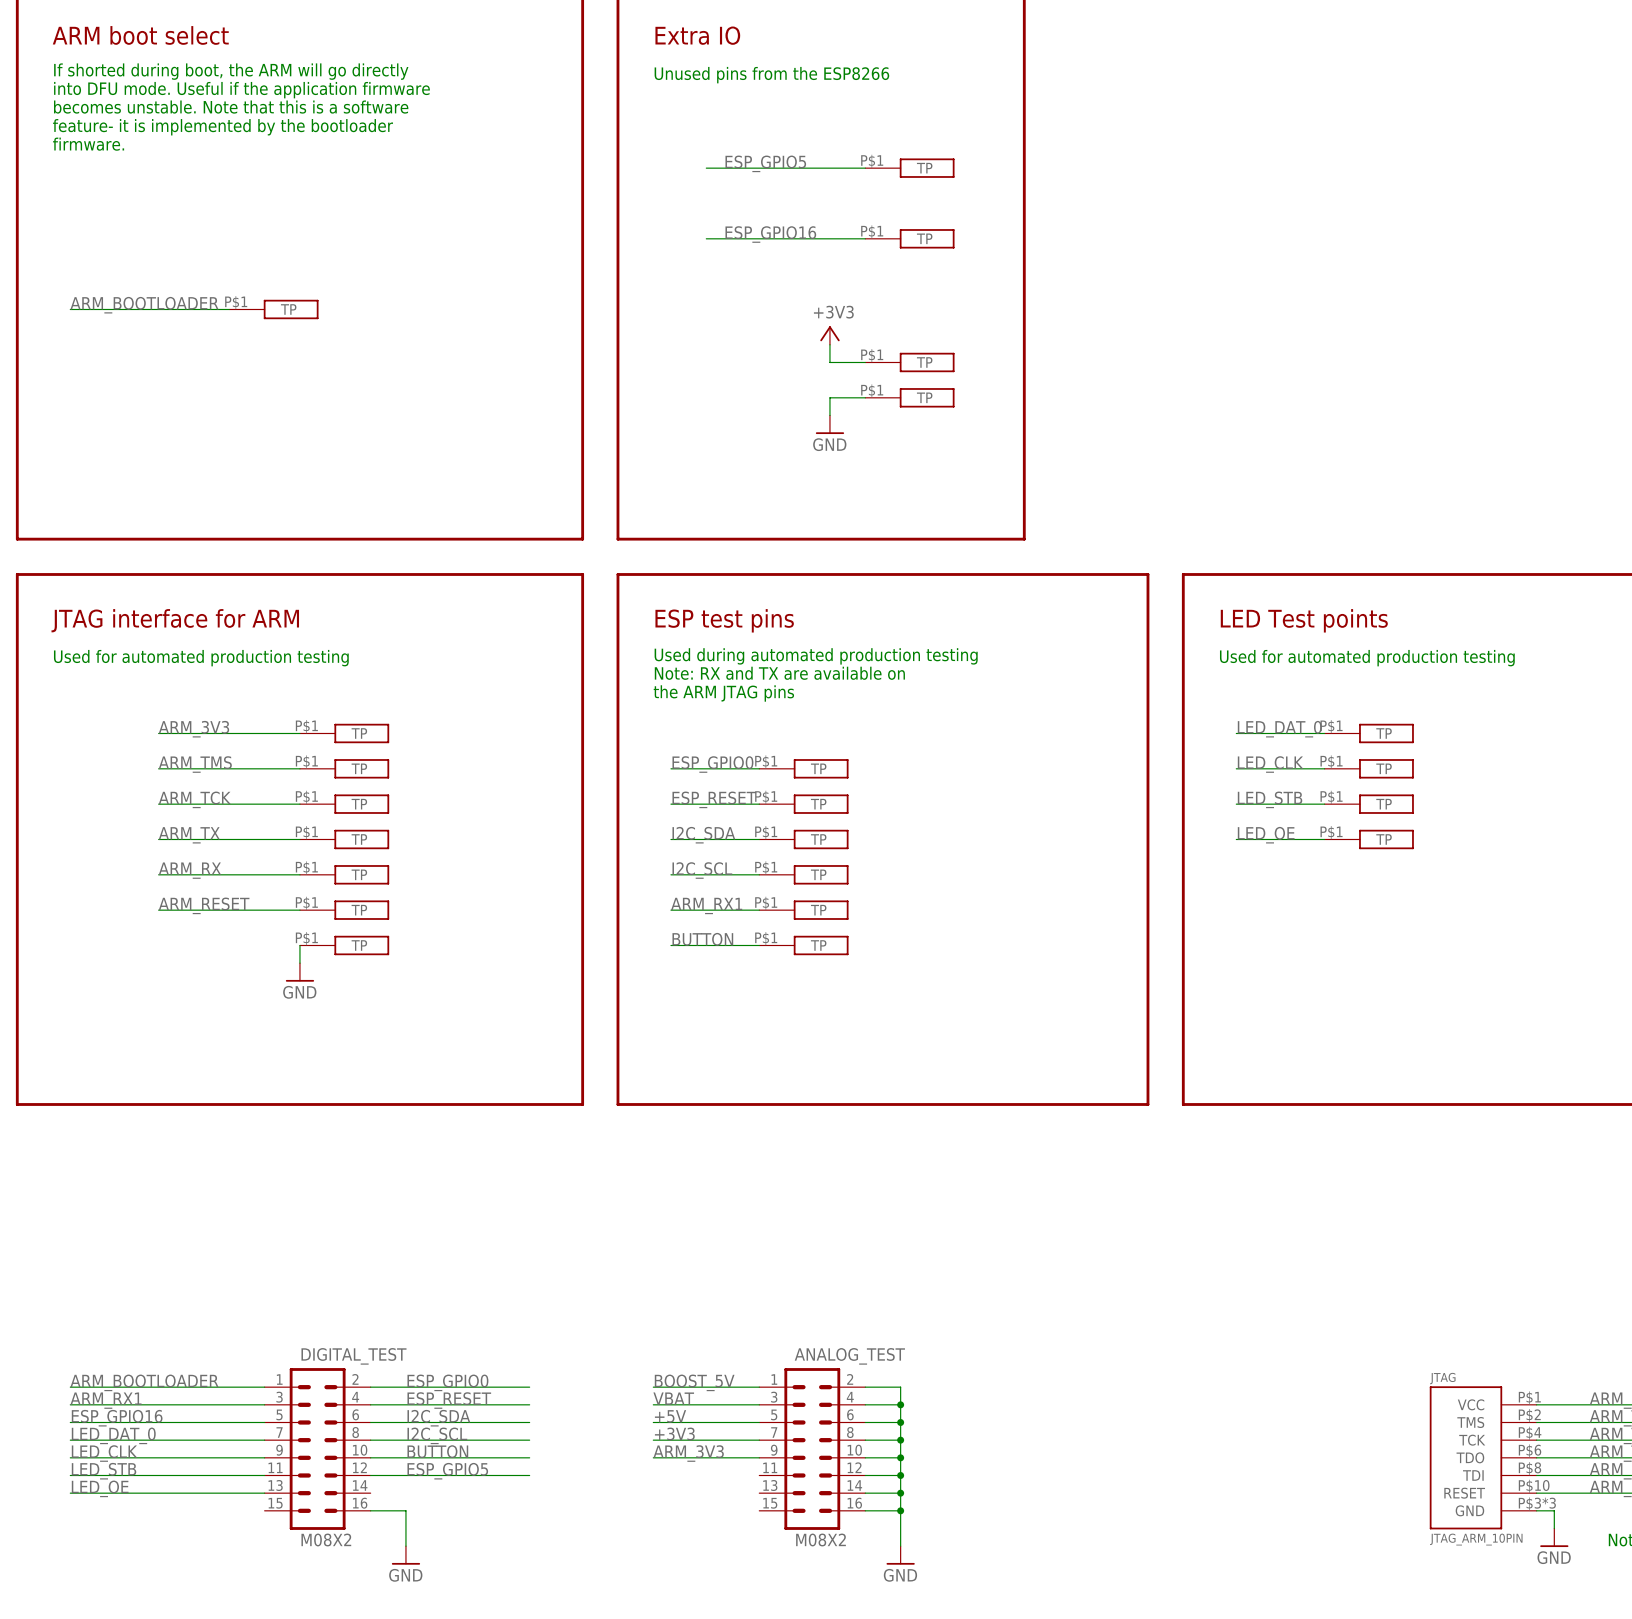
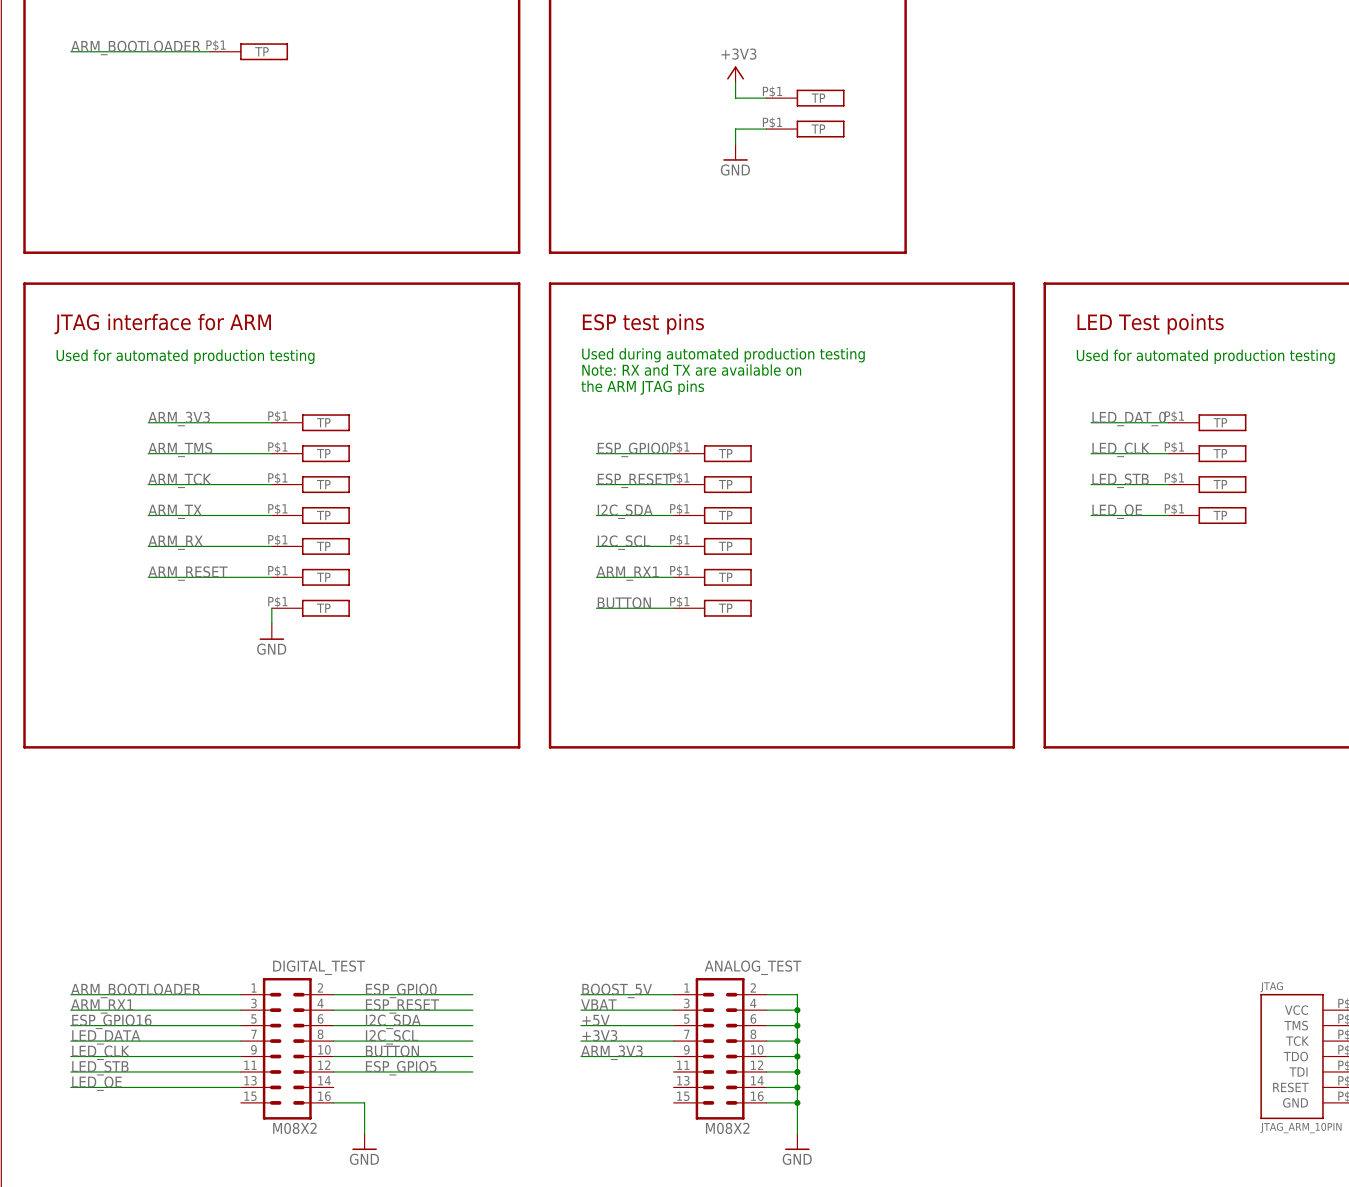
label: LED_DAT_0 (113, 1435) -> LED_DATA (106, 1037)

